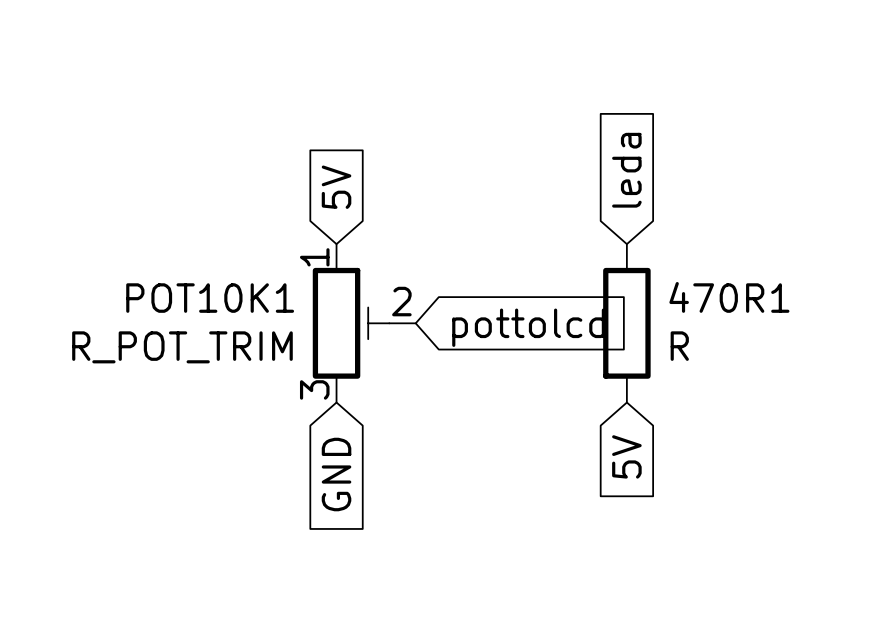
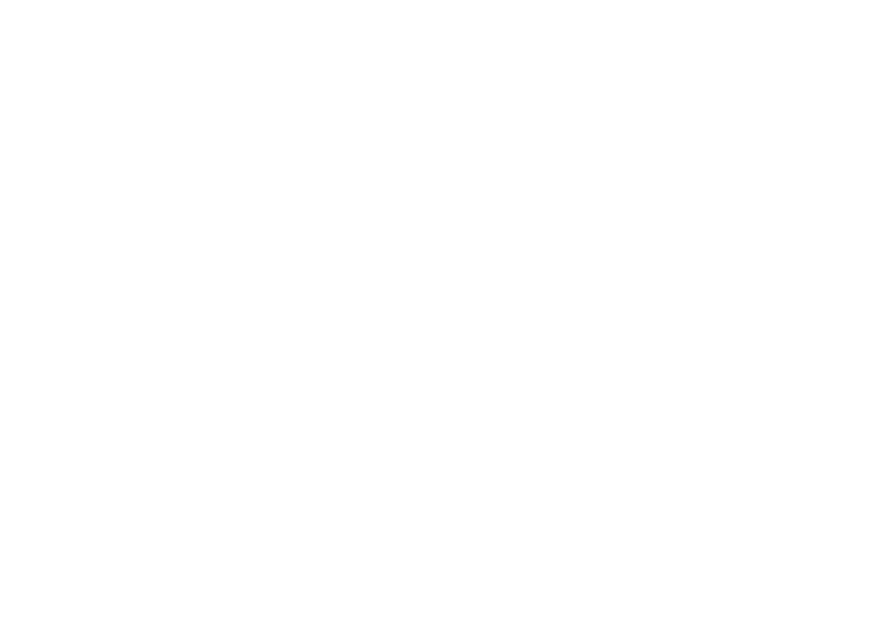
global label: leda (626, 170) -> none
global label: 5V (336, 187) -> none
POT10K1: R_POT_TRIM (364, 323) -> none
470R1: R (626, 323) -> none
global label: pottolcd (528, 327) -> none
global label: 5V (626, 456) -> none
global label: GND (336, 474) -> none

